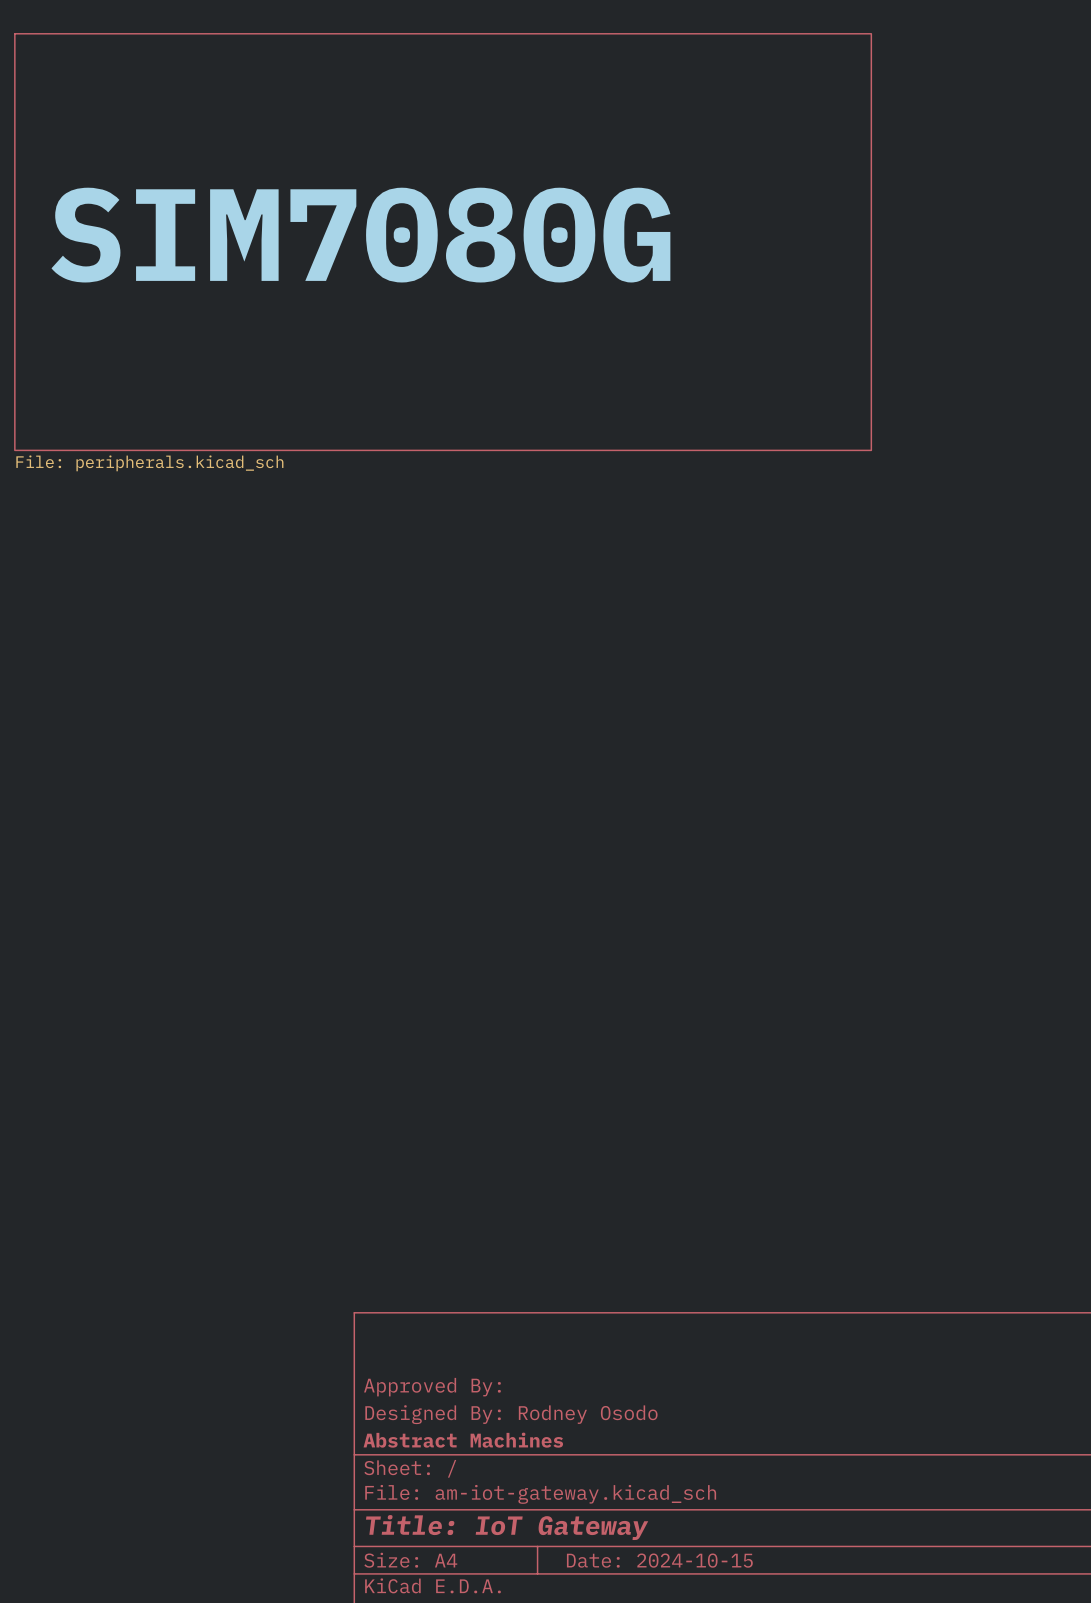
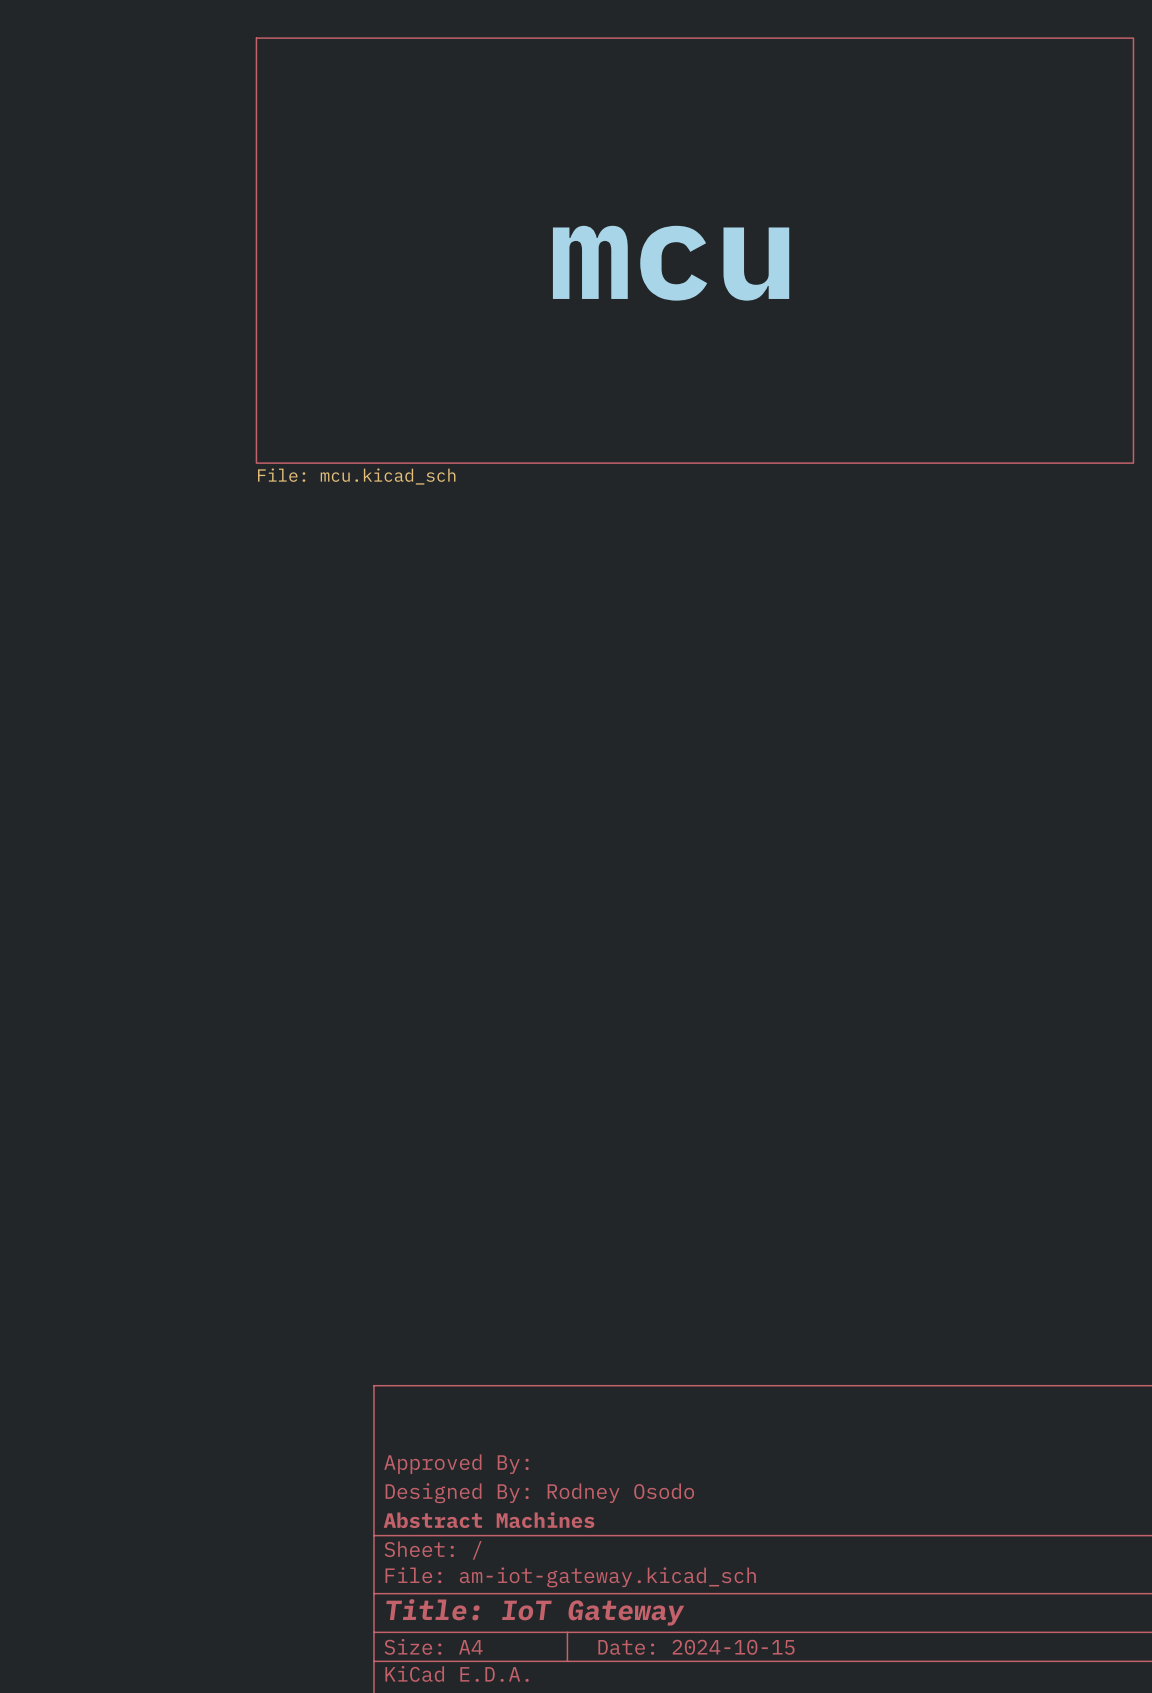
sheet mcu: none -> File: mcu.kicad_sch (694, 250)
sheet SIM7080G: File: peripherals.kicad_sch (443, 242) -> none

